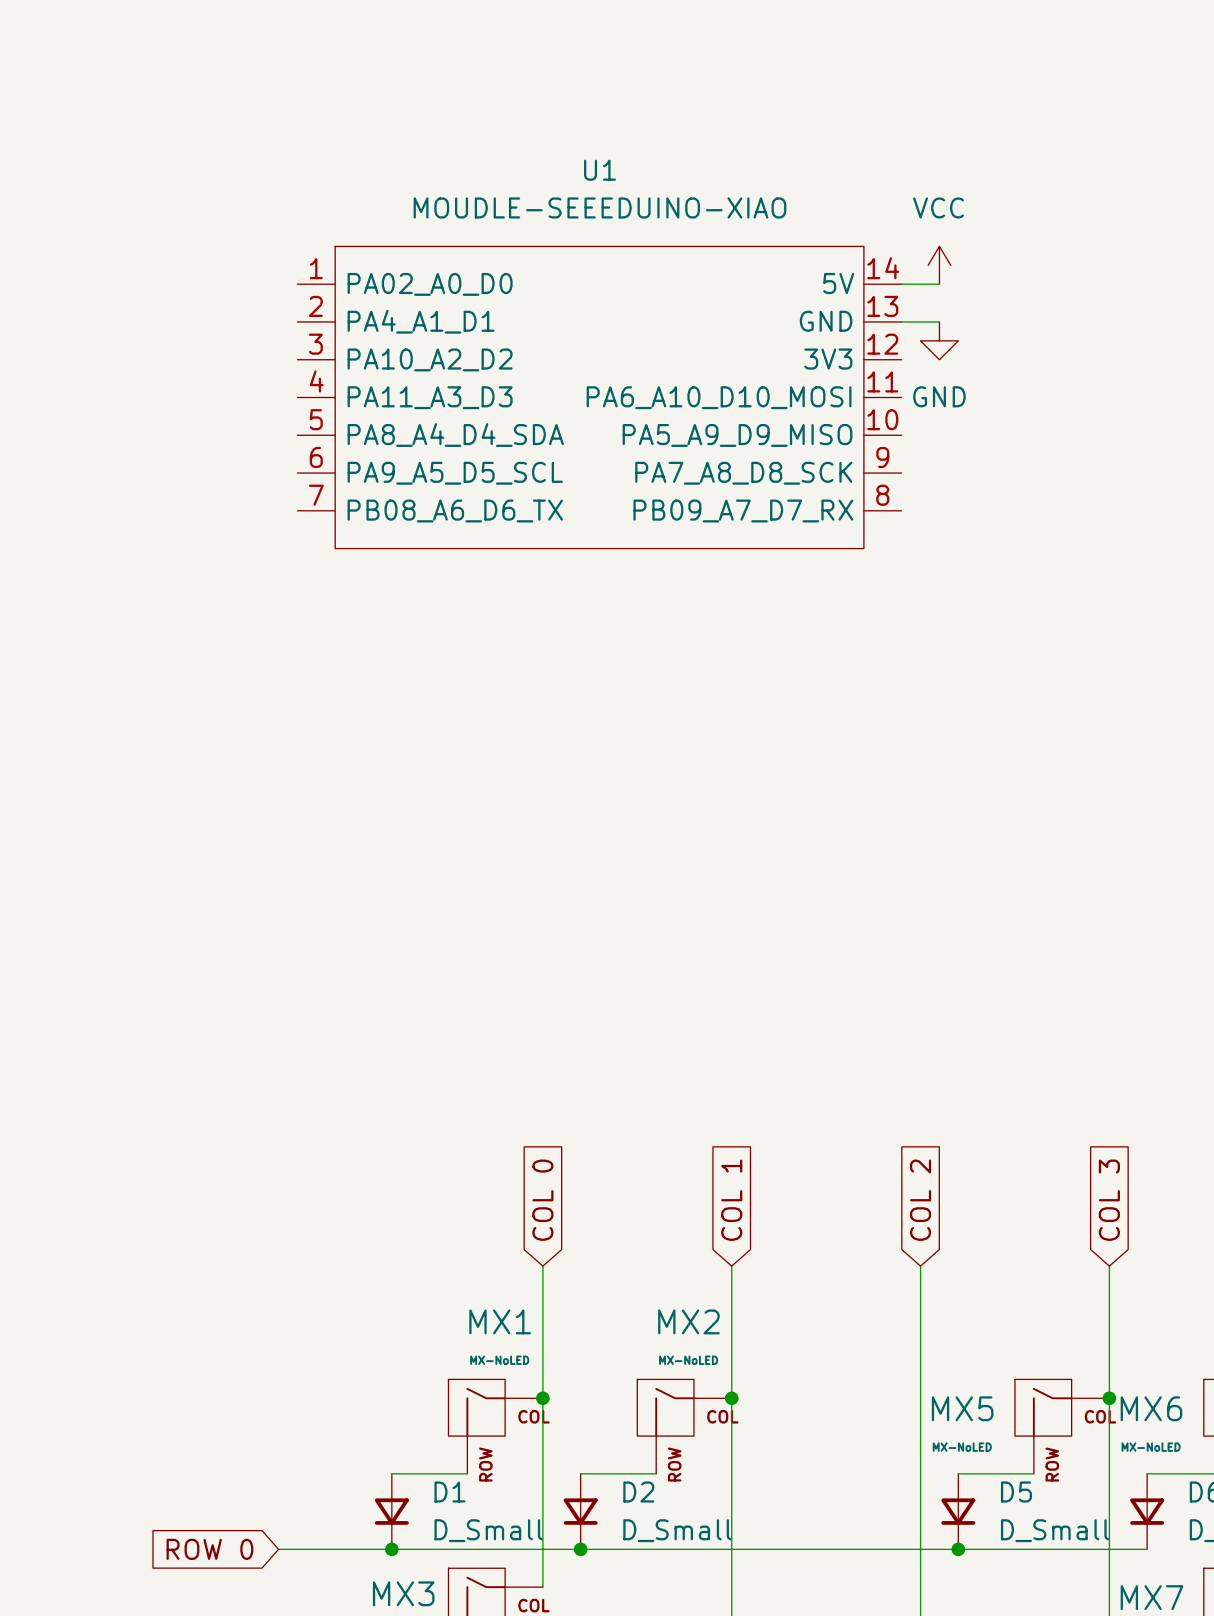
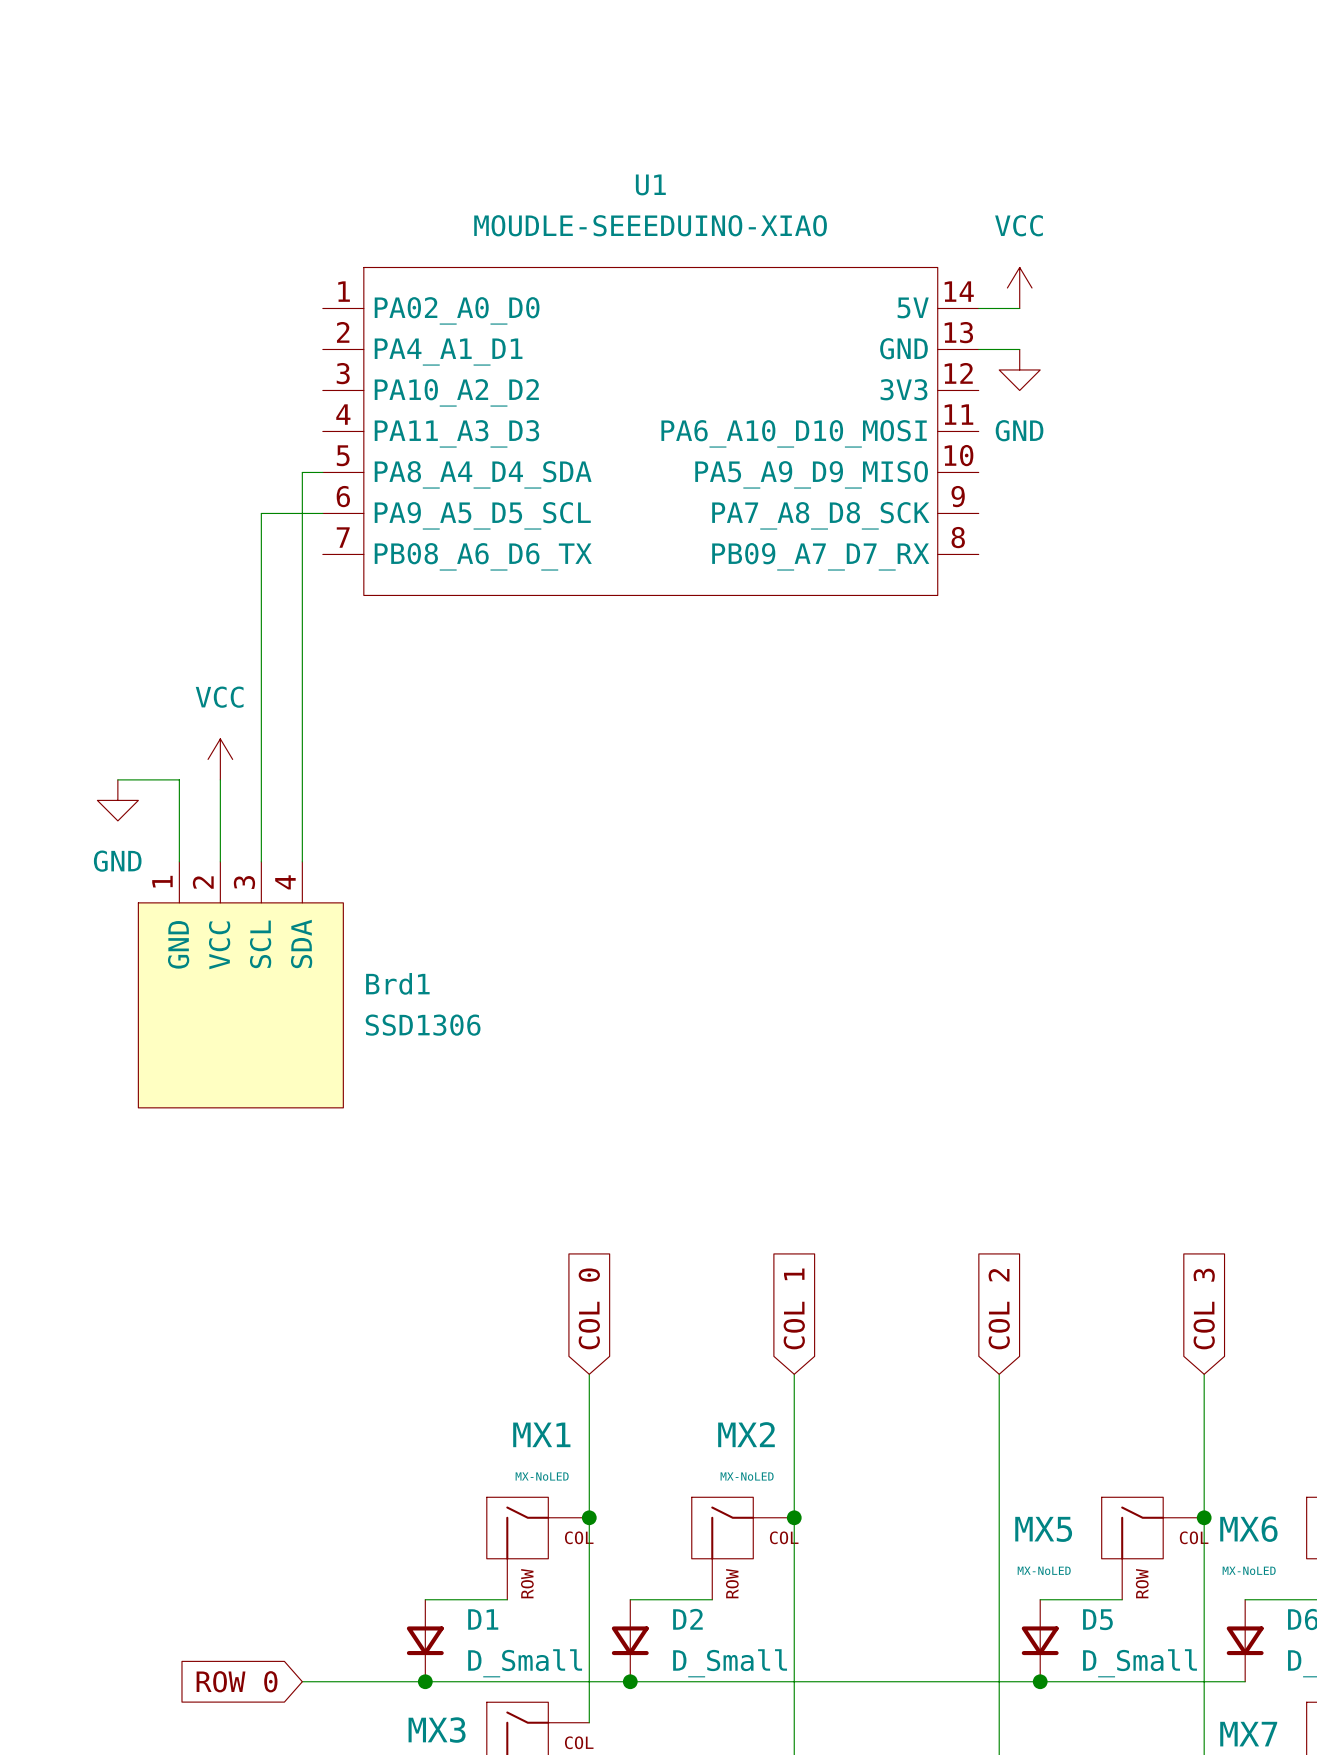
wire: none -> (322, 472) (302, 472) (302, 861)
wire: none -> (322, 513) (261, 513) (261, 861)
power symbol: none -> VCC (220, 759)
wire: none -> (117, 779) (179, 779) (179, 861)
wire: none -> (220, 779) (220, 861)
power symbol: none -> GND (117, 800)
Brd1: none -> SSD1306 (240, 984)

